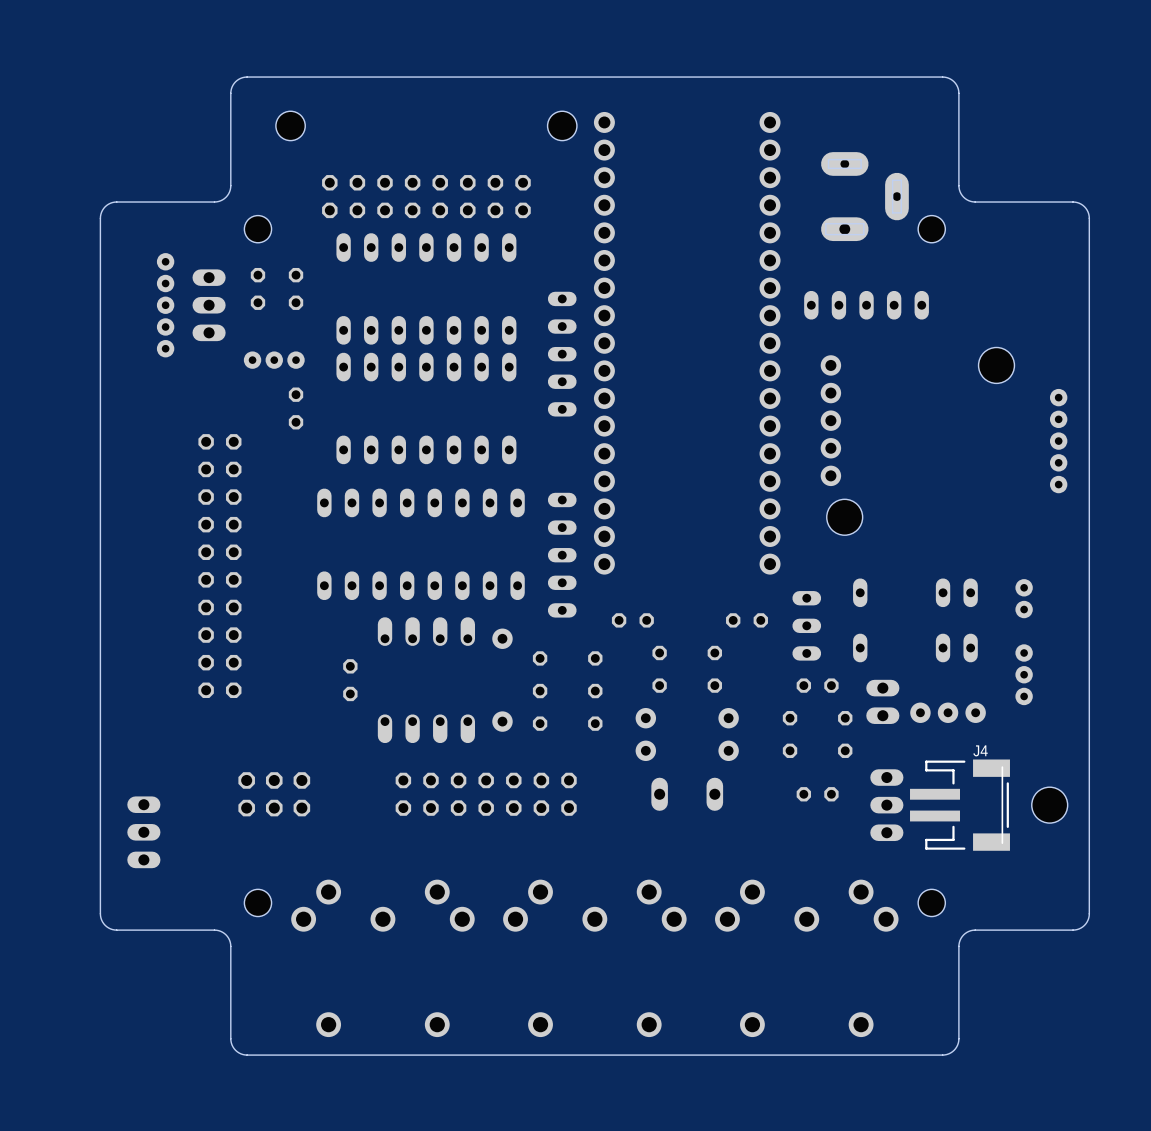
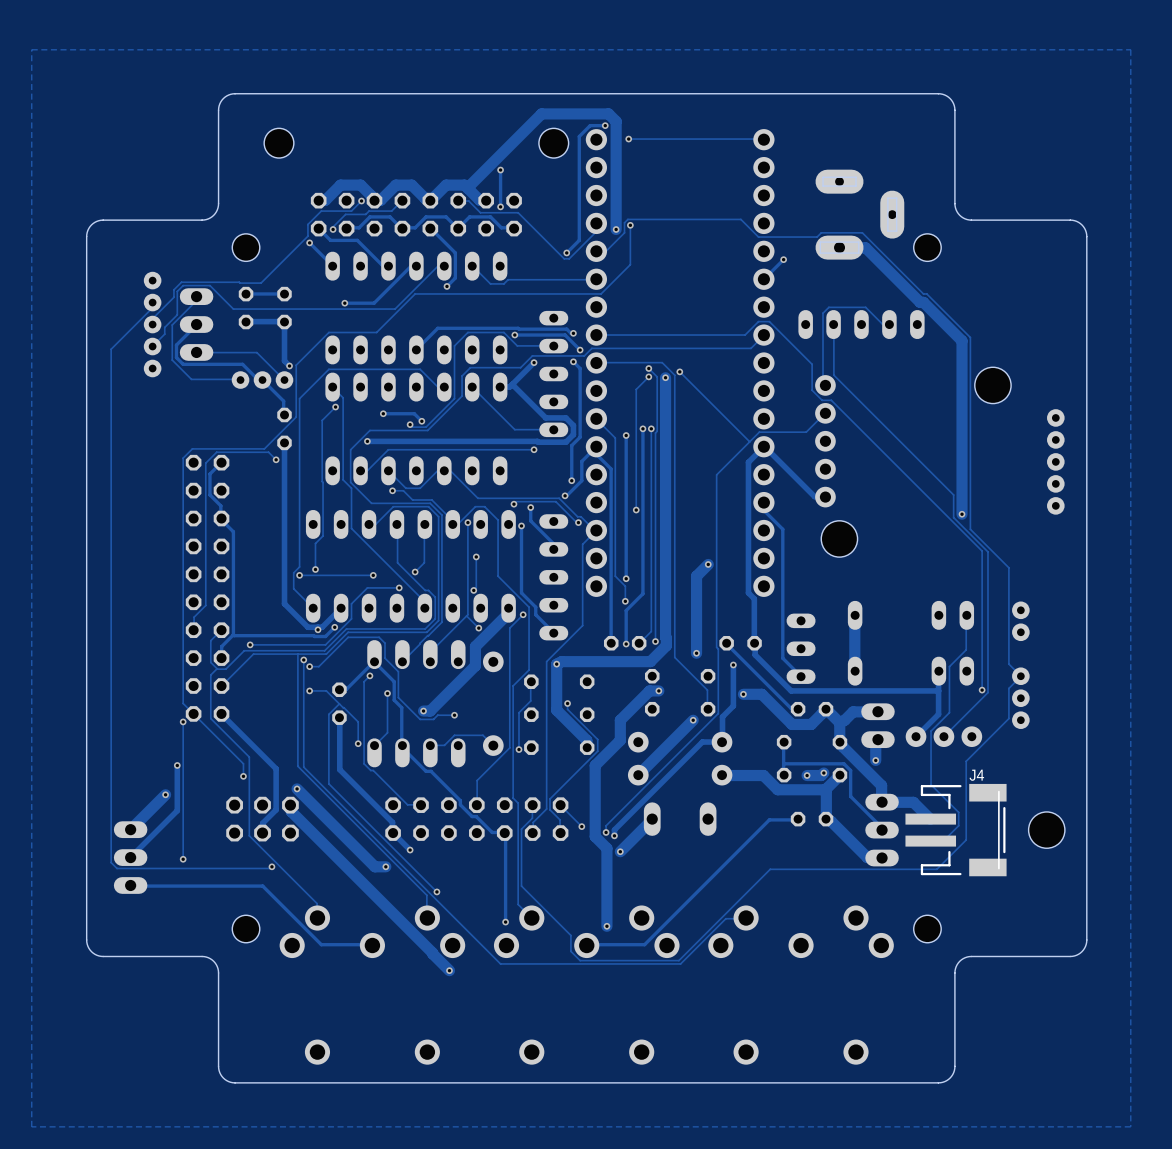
zone outline: none -> (1130, 49) (31, 49) (31, 1126) (1130, 1126) (1130, 49)
track: none -> (605, 125) (590, 125) (579, 136) (579, 240) (566, 252)
via: none -> (605, 125)
track: none -> (628, 139) (763, 139)
via: none -> (628, 139)
track: none -> (500, 170) (500, 206)
via: none -> (500, 170)
track: none -> (467, 188) (541, 113) (608, 113) (616, 121) (616, 229)
track: none -> (402, 200) (391, 211) (369, 211) (365, 214) (345, 214) (333, 226) (333, 229)
track: none -> (458, 200) (468, 201) (480, 212) (518, 212) (564, 258) (569, 258) (596, 232) (596, 223)
track: none -> (486, 200) (479, 200) (464, 185) (446, 185) (430, 200) (425, 198) (411, 185) (395, 185) (380, 200) (374, 200) (360, 185) (340, 185) (325, 200) (318, 200)
track: none -> (361, 201) (351, 211) (321, 211) (307, 224) (307, 236) (261, 283) (181, 282) (173, 289) (173, 297) (153, 318) (152, 324)
via: none -> (361, 201)
via: none -> (500, 206)
track: none -> (630, 225) (630, 264) (601, 293) (415, 293) (376, 332) (328, 332) (296, 365) (296, 417) (264, 448) (192, 448) (183, 458) (183, 703) (243, 763) (243, 776)
via: none -> (630, 225)
track: none -> (318, 228) (330, 240) (357, 240) (382, 265) (388, 266)
track: none -> (430, 228) (455, 252) (455, 278) (446, 286)
track: none -> (514, 228) (501, 227) (490, 216) (469, 216) (458, 228) (446, 216) (426, 216) (415, 227) (402, 228) (390, 216) (369, 216) (359, 227) (346, 228)
via: none -> (333, 229)
via: none -> (616, 229)
track: none -> (309, 242) (332, 266)
via: none -> (309, 242)
track: none -> (839, 247) (865, 247) (962, 340) (962, 514)
track: none -> (596, 251) (606, 251) (624, 232) (624, 222) (627, 219) (740, 219) (758, 237) (817, 237) (821, 232) (862, 232) (970, 337) (970, 529) (1008, 567) (1008, 664) (1020, 676) (1008, 688) (1008, 718) (966, 761) (966, 840) (936, 869) (770, 869) (678, 960) (580, 960) (570, 951) (570, 935) (521, 886) (521, 829) (532, 818) (532, 805)
via: none -> (566, 252)
track: none -> (783, 259) (763, 279)
via: none -> (783, 259)
track: none -> (416, 266) (410, 266) (374, 303) (344, 303)
track: none -> (444, 266) (437, 266) (395, 309) (233, 309) (209, 285) (183, 285) (177, 291) (177, 314) (164, 327) (164, 334) (152, 346)
track: none -> (472, 266) (490, 283) (503, 283) (508, 279) (596, 279)
via: none -> (446, 286)
track: none -> (284, 294) (246, 294)
track: none -> (196, 296) (196, 300) (172, 324) (172, 360) (191, 379) (240, 380)
track: none -> (152, 302) (152, 308) (111, 349) (111, 862) (117, 868) (270, 868) (271, 866)
via: none -> (344, 303)
track: none -> (246, 322) (284, 322) (284, 360) (289, 366)
track: none -> (196, 324) (176, 345) (176, 357) (183, 364) (242, 364) (257, 379) (262, 380) (283, 401) (284, 414)
track: none -> (833, 324) (833, 375) (953, 494) (953, 517) (987, 551) (987, 692) (943, 736)
track: none -> (889, 324) (882, 324) (865, 307) (828, 307) (823, 313) (823, 383) (825, 385)
track: none -> (573, 333) (566, 329) (437, 328) (416, 349)
via: none -> (573, 333)
track: none -> (514, 335) (565, 335) (580, 350)
via: none -> (514, 335)
track: none -> (596, 335) (745, 335) (758, 321) (769, 321) (812, 364) (812, 390) (822, 400) (831, 400) (982, 551) (982, 690)
track: none -> (763, 335) (750, 348) (591, 348) (584, 355) (532, 355) (520, 367) (470, 367) (462, 376) (462, 396) (427, 430) (369, 430) (350, 449) (350, 482) (371, 503) (430, 503) (441, 515) (441, 622) (402, 661)
track: none -> (553, 346) (517, 345) (503, 332) (467, 332) (454, 345) (454, 398) (426, 427) (412, 427) (410, 424)
via: none -> (580, 350)
track: none -> (196, 352) (256, 352) (284, 380)
track: none -> (534, 362) (509, 386) (500, 387)
via: none -> (534, 362)
track: none -> (573, 361) (580, 368) (580, 437) (571, 445) (571, 480)
via: none -> (573, 361)
track: none -> (596, 363) (662, 362) (674, 375) (674, 657) (707, 690) (708, 709)
via: none -> (289, 366)
track: none -> (648, 368) (657, 376) (655, 641)
via: none -> (648, 368)
track: none -> (679, 371) (749, 441)
via: none -> (679, 371)
track: none -> (648, 376) (636, 389) (636, 510)
via: none -> (648, 376)
track: none -> (665, 377) (666, 645) (650, 661) (561, 661) (556, 664) (556, 710) (586, 740) (587, 747)
via: none -> (665, 377)
track: none -> (512, 384) (545, 417) (565, 417) (573, 425) (573, 434) (565, 442) (367, 441)
track: none -> (332, 387) (343, 397) (343, 479) (351, 488) (351, 528) (424, 601) (424, 608)
track: none -> (444, 387) (437, 386) (420, 369) (328, 369) (299, 398) (299, 566) (293, 572) (293, 588) (313, 608)
track: none -> (472, 387) (514, 429) (553, 429)
track: none -> (335, 407) (322, 420) (323, 536) (315, 543) (315, 569)
via: none -> (335, 407)
track: none -> (383, 413) (414, 413) (421, 421)
via: none -> (383, 413)
track: none -> (825, 413) (806, 432) (759, 432) (716, 474) (718, 713) (606, 825) (606, 832)
track: none -> (596, 418) (615, 438) (615, 576) (625, 586) (625, 601)
via: none -> (421, 421)
via: none -> (410, 424)
track: none -> (642, 428) (642, 593) (626, 610) (626, 644)
via: none -> (642, 428)
track: none -> (651, 428) (651, 631) (639, 643)
via: none -> (651, 428)
track: none -> (626, 435) (626, 578)
via: none -> (626, 435)
via: none -> (367, 441)
track: none -> (284, 443) (284, 603) (307, 627) (322, 627) (341, 608)
track: none -> (534, 449) (388, 449) (367, 470) (360, 470)
via: none -> (534, 449)
track: none -> (276, 459) (268, 452) (216, 452) (205, 463) (205, 605) (194, 617) (193, 630)
via: none -> (276, 459)
track: none -> (221, 462) (209, 474) (209, 494) (220, 505) (221, 520) (233, 531) (233, 634)
track: none -> (388, 470) (405, 488) (420, 488) (436, 471) (444, 470) (451, 471) (477, 498) (559, 498) (577, 516) (580, 516) (596, 530) (582, 544) (582, 625) (546, 661) (546, 809) (533, 822) (532, 833)
via: none -> (571, 480)
track: none -> (392, 490) (403, 490) (412, 500) (431, 500) (452, 520) (452, 524)
via: none -> (392, 490)
track: none -> (565, 495) (581, 480) (581, 461) (596, 446) (593, 451) (611, 469) (611, 643)
via: none -> (565, 495)
track: none -> (825, 497) (814, 496) (763, 446) (748, 462) (748, 592) (754, 598) (755, 654) (791, 690) (938, 690)
track: none -> (763, 502) (764, 510) (782, 529) (782, 658) (801, 676)
track: none -> (513, 504) (516, 501) (555, 501) (578, 522)
via: none -> (513, 504)
track: none -> (530, 507) (530, 520) (553, 543) (553, 549)
via: none -> (530, 507)
via: none -> (636, 510)
via: none -> (962, 514)
track: none -> (467, 522) (467, 614) (431, 651) (430, 661)
via: none -> (467, 522)
via: none -> (578, 522)
track: none -> (369, 524) (375, 524) (393, 506) (428, 506) (438, 516) (438, 620) (426, 632) (348, 632) (326, 654) (253, 654) (221, 685)
track: none -> (396, 524) (397, 562) (425, 590) (428, 590) (435, 597) (435, 618) (425, 628) (346, 628) (324, 650) (244, 650) (225, 669) (217, 669) (210, 662) (210, 640) (221, 630)
track: none -> (424, 524) (424, 562) (415, 572)
track: none -> (452, 524) (457, 524) (475, 506) (484, 506) (498, 520) (498, 576) (529, 607) (529, 670) (513, 685) (513, 798) (518, 803) (518, 904) (531, 918)
track: none -> (521, 525) (521, 592) (535, 607) (535, 614) (553, 633)
via: none -> (521, 525)
track: none -> (476, 556) (476, 587) (473, 590)
via: none -> (476, 556)
track: none -> (708, 564) (696, 576) (696, 653)
via: none -> (708, 564)
via: none -> (315, 569)
via: none -> (415, 572)
via: none -> (299, 575)
track: none -> (373, 575) (299, 575)
via: none -> (373, 575)
via: none -> (626, 578)
track: none -> (399, 587) (367, 587) (351, 603) (351, 618) (325, 644) (250, 644)
via: none -> (399, 587)
via: none -> (473, 590)
via: none -> (625, 601)
track: none -> (508, 608) (508, 613) (475, 646) (475, 665) (430, 711) (423, 711)
track: none -> (523, 614) (509, 628) (509, 747) (477, 780) (476, 805)
via: none -> (523, 614)
track: none -> (855, 615) (855, 671)
track: none -> (966, 615) (966, 649) (949, 666) (949, 712) (931, 731) (931, 784) (958, 812) (958, 825) (943, 840) (930, 841)
track: none -> (466, 615) (478, 628)
track: none -> (334, 627) (325, 636) (233, 634)
via: none -> (334, 627)
via: none -> (478, 628)
via: none -> (318, 629)
track: none -> (233, 634) (221, 646) (221, 658)
via: none -> (655, 641)
track: none -> (726, 643) (791, 708) (798, 709)
via: none -> (250, 644)
via: none -> (626, 644)
via: none -> (696, 653)
track: none -> (297, 654) (297, 766) (426, 895) (427, 918)
track: none -> (303, 659) (303, 767) (500, 963) (680, 963) (725, 918) (746, 918)
via: none -> (303, 659)
via: none -> (556, 664)
track: none -> (733, 664) (733, 706) (722, 716) (722, 742) (702, 742) (614, 829) (614, 835)
via: none -> (733, 664)
track: none -> (309, 666) (318, 666) (348, 637) (379, 637) (385, 643) (385, 658) (398, 671) (398, 697) (420, 719) (433, 719) (437, 715) (454, 715)
via: none -> (309, 666)
track: none -> (217, 668) (210, 675) (210, 718) (249, 757) (249, 835) (317, 903) (317, 918)
track: none -> (938, 671) (938, 714) (916, 736)
track: none -> (369, 675) (364, 681) (364, 763) (407, 804) (421, 805)
via: none -> (369, 675)
track: none -> (531, 681) (530, 700) (519, 712) (519, 749)
track: none -> (339, 689) (346, 689) (374, 661) (394, 681) (394, 700) (401, 707) (401, 747) (426, 771) (431, 771) (460, 800) (460, 804) (472, 816) (476, 816) (492, 832) (505, 834) (505, 922)
via: none -> (982, 690)
track: none -> (309, 690) (326, 690) (358, 721) (358, 743)
via: none -> (309, 690)
track: none -> (658, 690) (649, 690) (620, 720) (620, 740) (595, 765) (595, 836) (606, 848) (606, 926)
via: none -> (658, 690)
track: none -> (387, 693) (387, 732) (374, 745)
via: none -> (387, 693)
track: none -> (743, 694) (761, 694) (792, 724) (811, 724) (826, 709) (839, 722)
via: none -> (743, 694)
track: none -> (567, 703) (567, 709) (597, 739) (597, 751) (549, 798) (549, 809) (560, 819) (560, 833)
via: none -> (567, 703)
track: none -> (339, 703) (328, 714) (328, 783) (436, 891)
via: none -> (423, 711)
track: none -> (877, 711) (853, 711) (839, 722)
track: none -> (221, 713) (276, 768) (276, 809) (262, 823) (262, 833)
via: none -> (454, 715)
track: none -> (339, 717) (339, 769) (392, 822) (392, 832) (410, 850)
track: none -> (693, 720) (638, 775)
via: none -> (693, 720)
track: none -> (183, 721) (183, 859)
via: none -> (183, 721)
track: none -> (839, 722) (839, 742) (881, 785) (882, 802) (913, 802) (930, 819)
track: none -> (877, 739) (875, 742) (875, 760)
track: none -> (784, 742) (784, 775)
via: none -> (358, 743)
track: none -> (493, 745) (482, 735) (454, 735) (444, 745) (430, 745)
via: none -> (519, 749)
via: none -> (875, 760)
track: none -> (783, 763) (843, 763) (850, 770) (850, 796) (882, 830)
track: none -> (177, 765) (177, 810) (130, 857)
via: none -> (177, 765)
track: none -> (823, 773) (821, 775) (807, 775)
via: none -> (823, 773)
track: none -> (722, 775) (763, 775) (777, 789) (826, 789)
track: none -> (839, 775) (826, 788) (826, 819) (831, 821) (867, 857) (882, 858)
via: none -> (807, 775)
via: none -> (243, 776)
track: none -> (297, 788) (374, 866) (385, 866)
via: none -> (297, 788)
track: none -> (165, 794) (130, 829)
via: none -> (165, 794)
track: none -> (290, 805) (291, 811) (449, 970)
track: none -> (560, 805) (581, 826)
track: none -> (652, 819) (620, 851)
track: none -> (798, 819) (769, 819) (644, 944) (586, 945)
via: none -> (581, 826)
via: none -> (606, 832)
via: none -> (614, 835)
via: none -> (410, 850)
via: none -> (620, 851)
via: none -> (183, 859)
via: none -> (271, 866)
via: none -> (385, 866)
track: none -> (130, 885) (262, 886) (321, 944) (372, 945)
via: none -> (436, 891)
via: none -> (505, 922)
via: none -> (606, 926)
via: none -> (449, 970)

